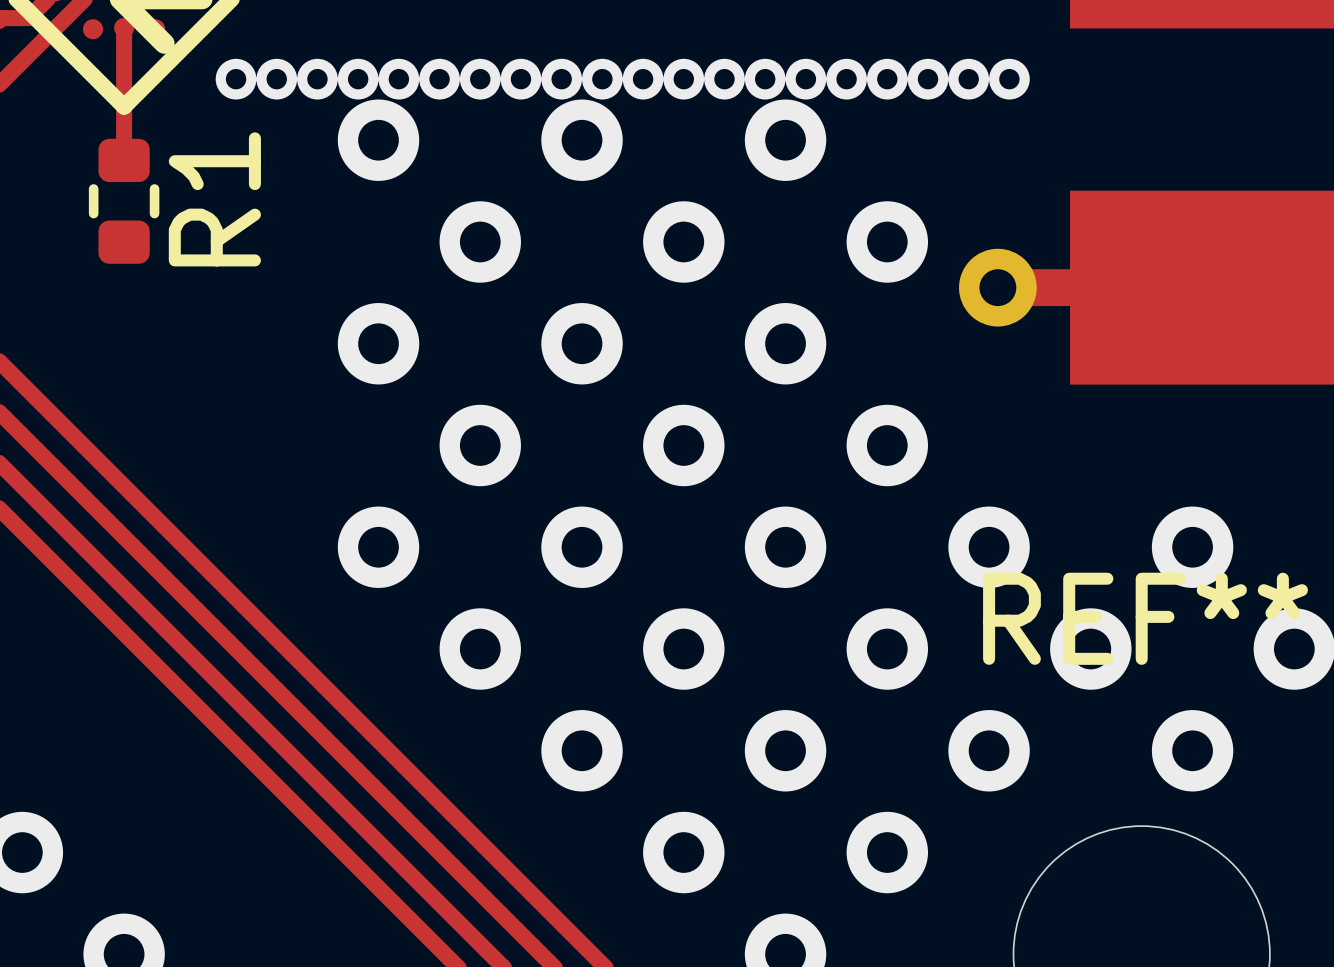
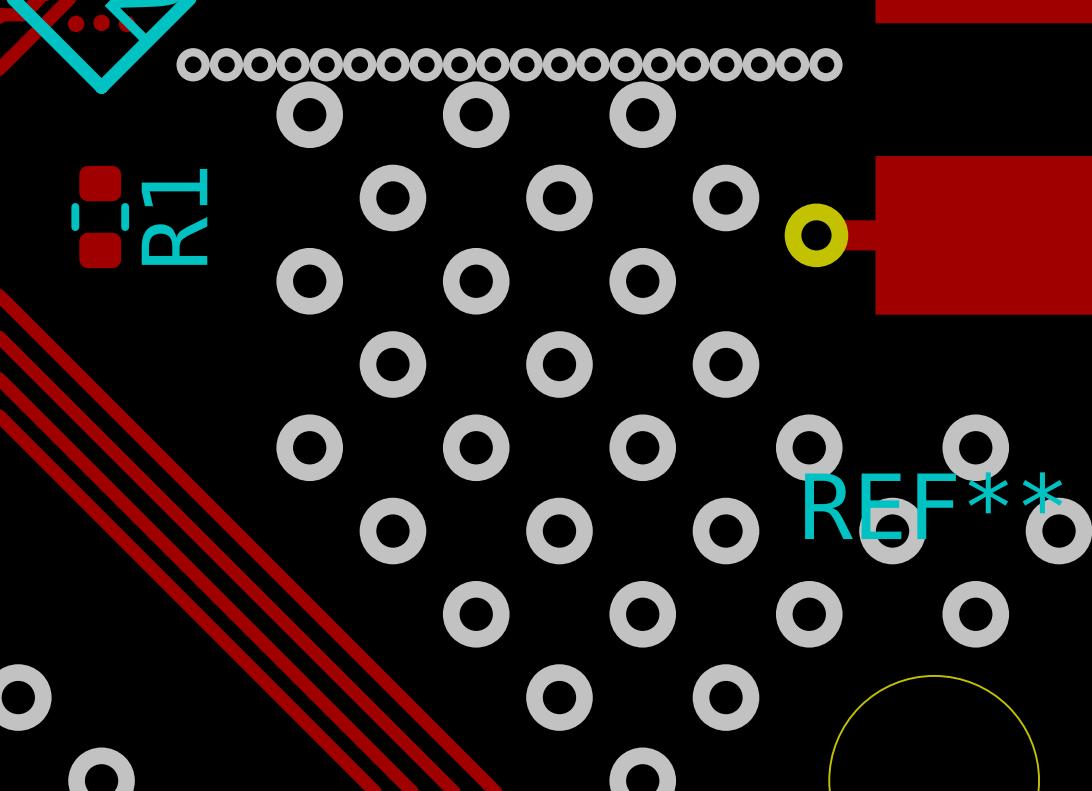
track: (124, 27) (124, 160) -> none
R1 position: (124, 201) -> (100, 217)

